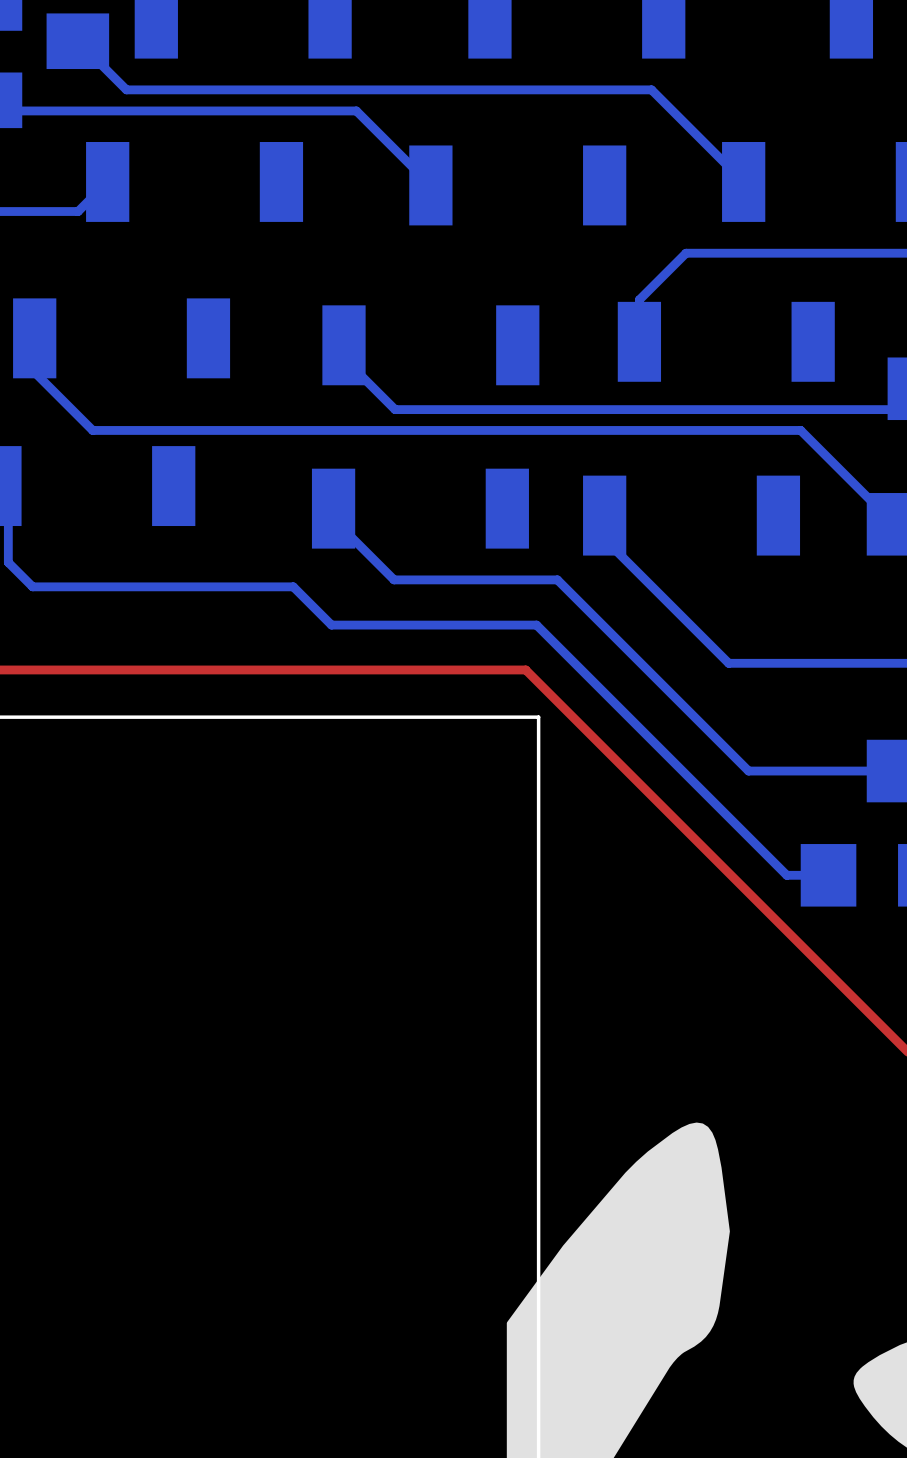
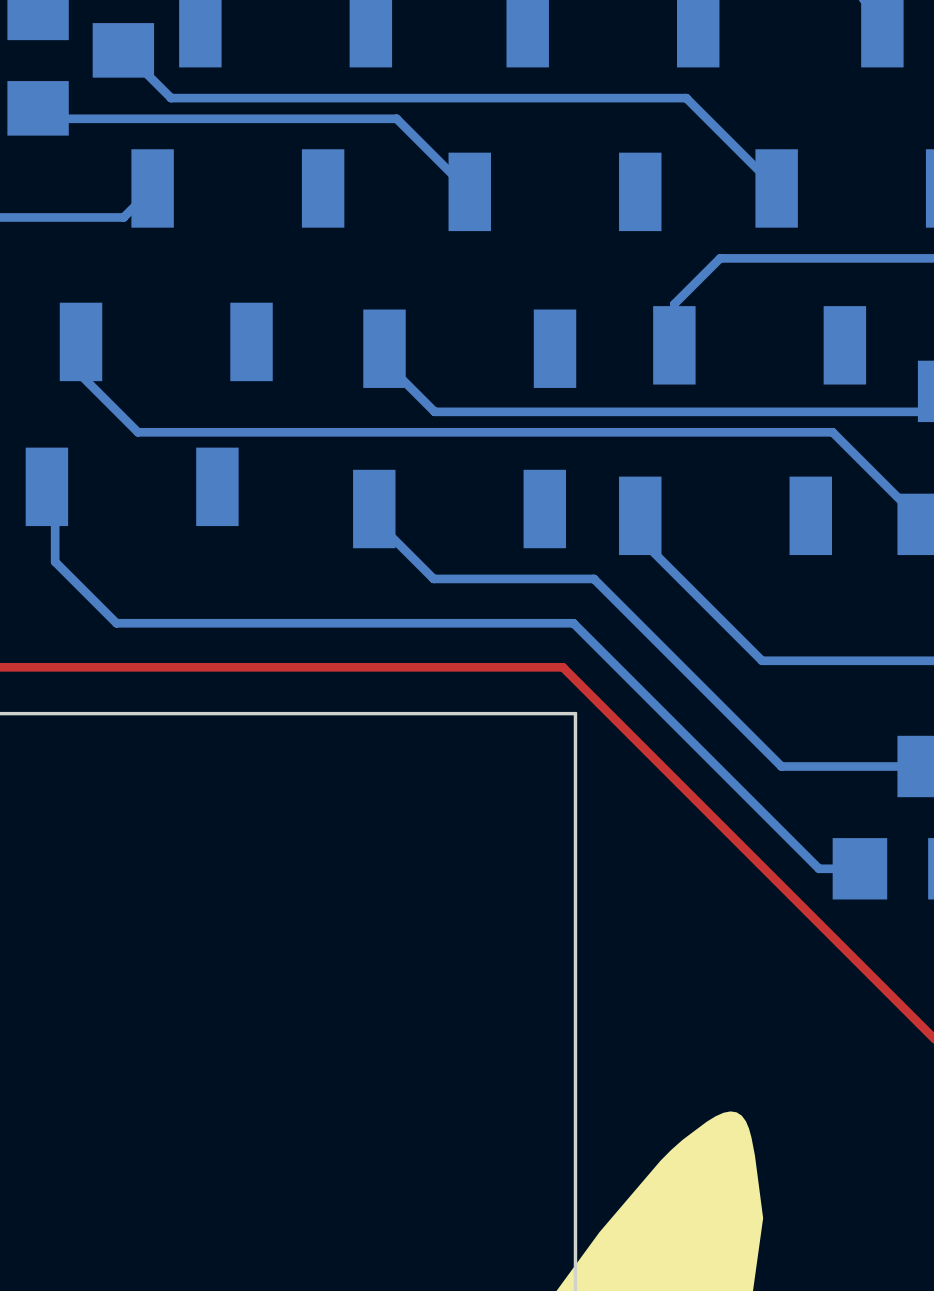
bottom track: (32, 586) (293, 586) (331, 625) -> (79, 585) (116, 623) (372, 623)

